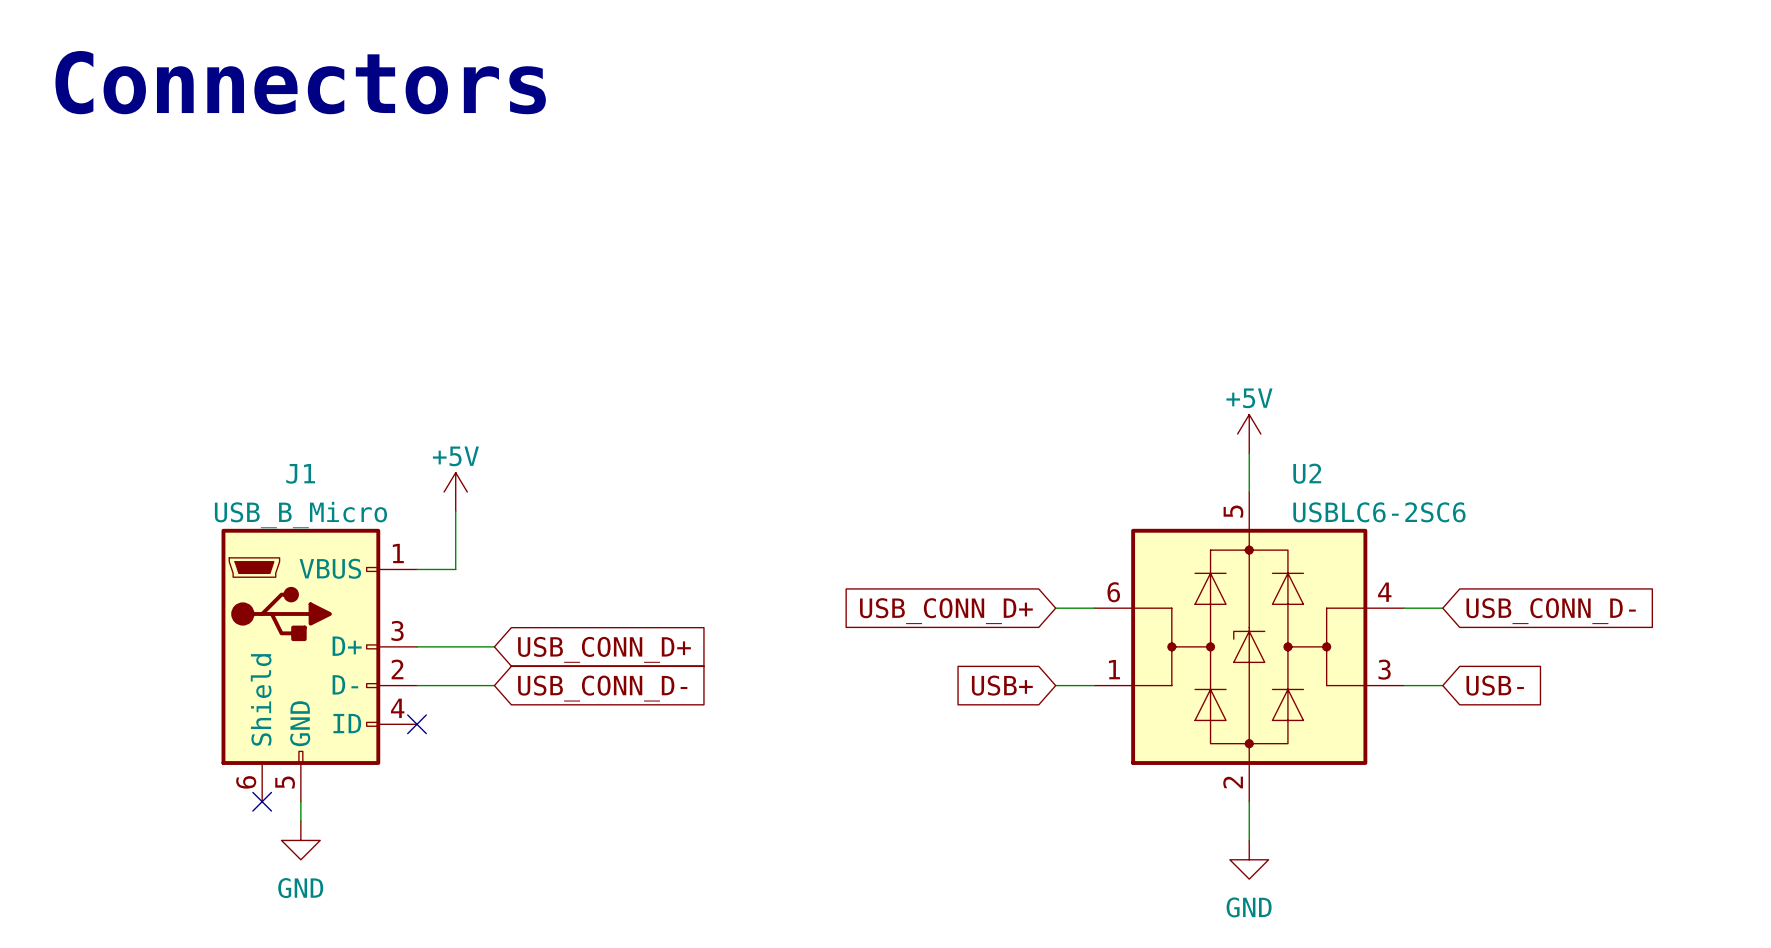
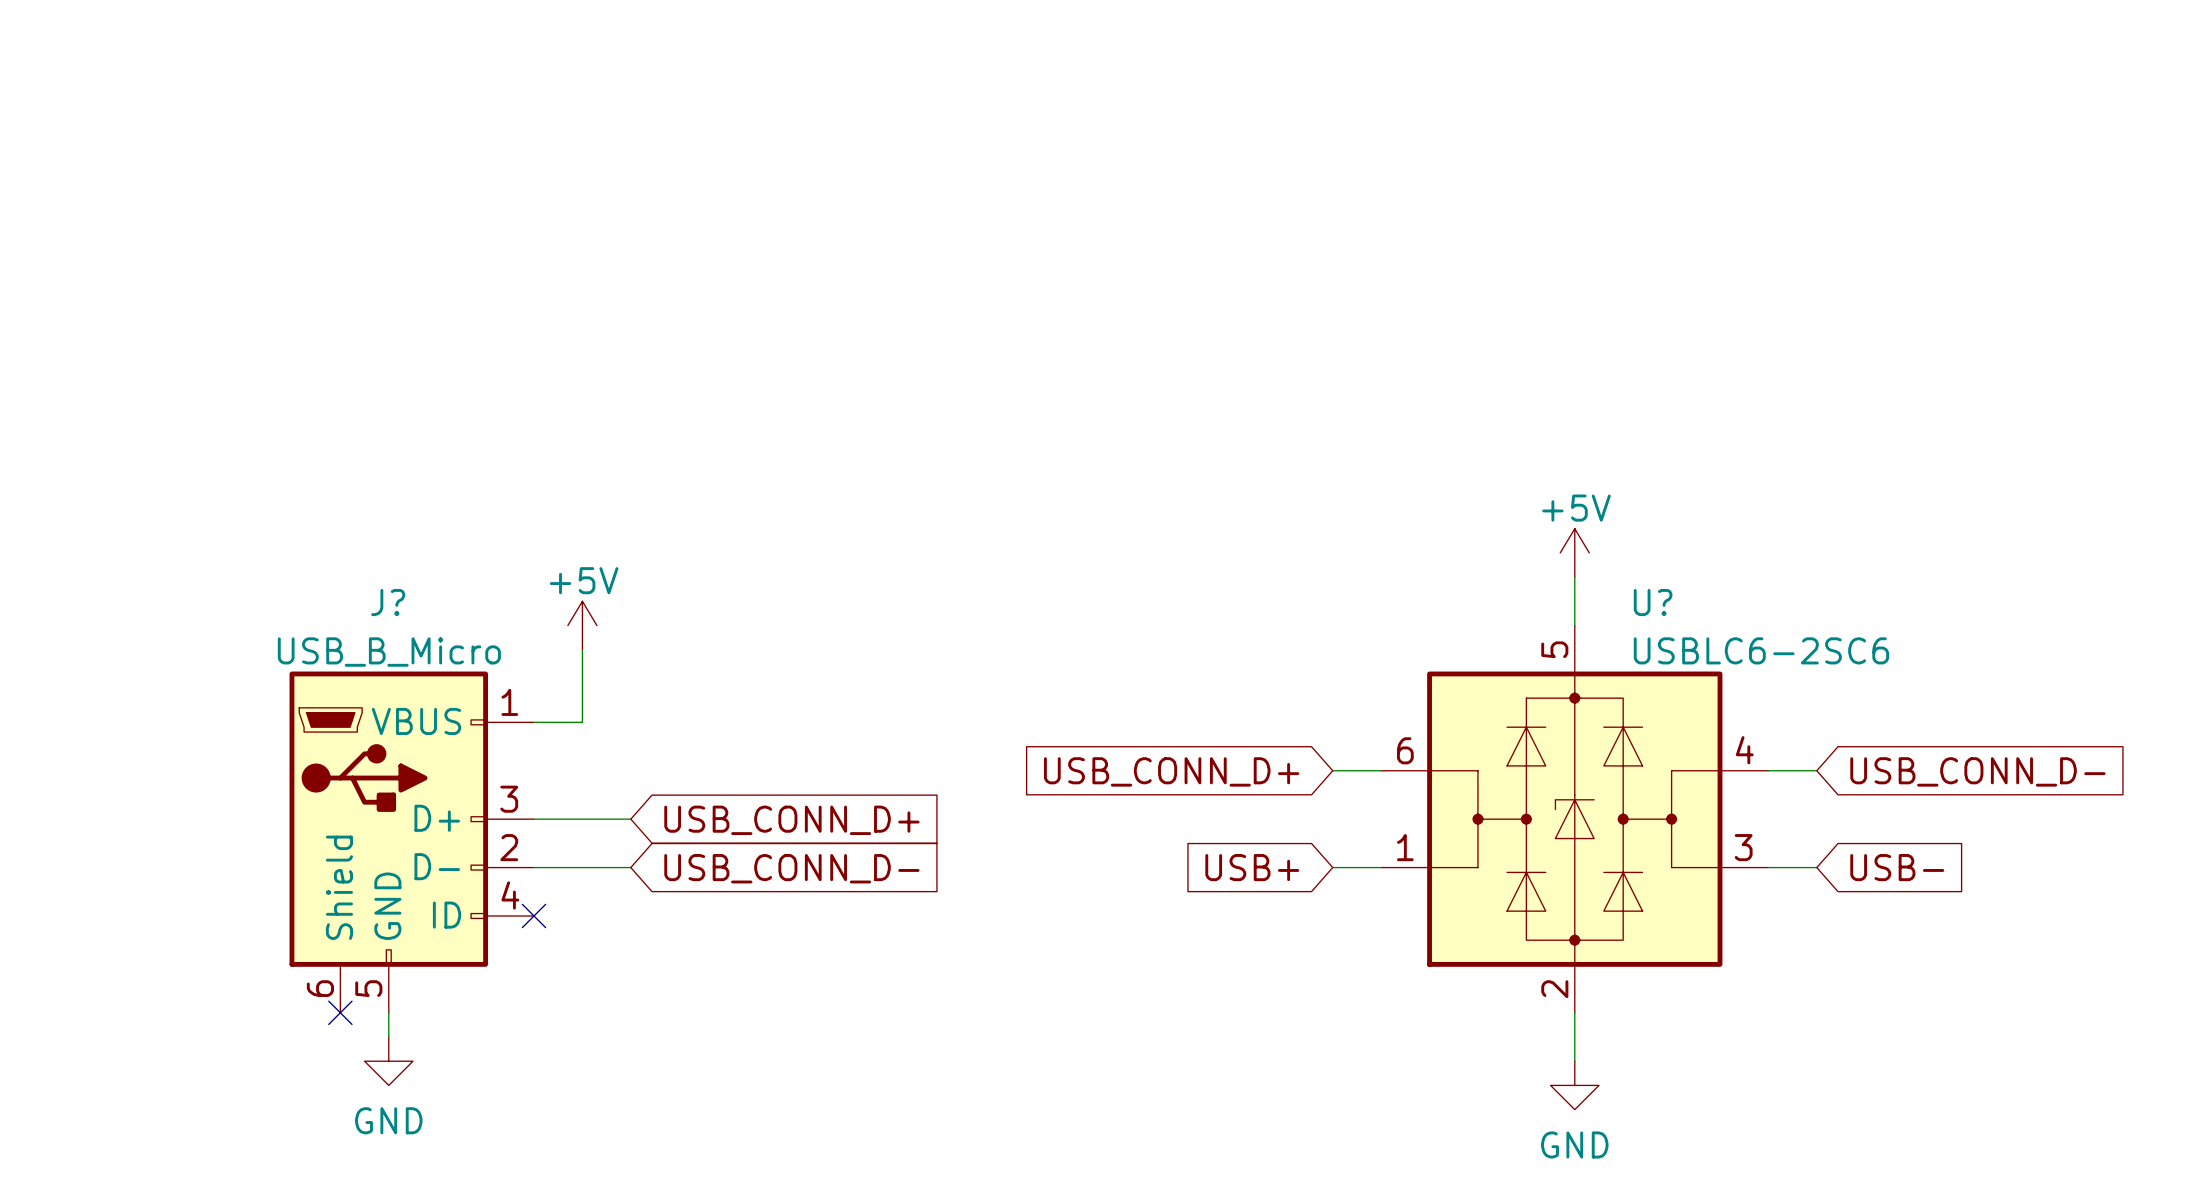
text: Connectors (300, 82) -> none
J1 name: J1 (300, 473) -> J? (388, 602)
U2 name: U2 (1307, 473) -> U? (1653, 602)

